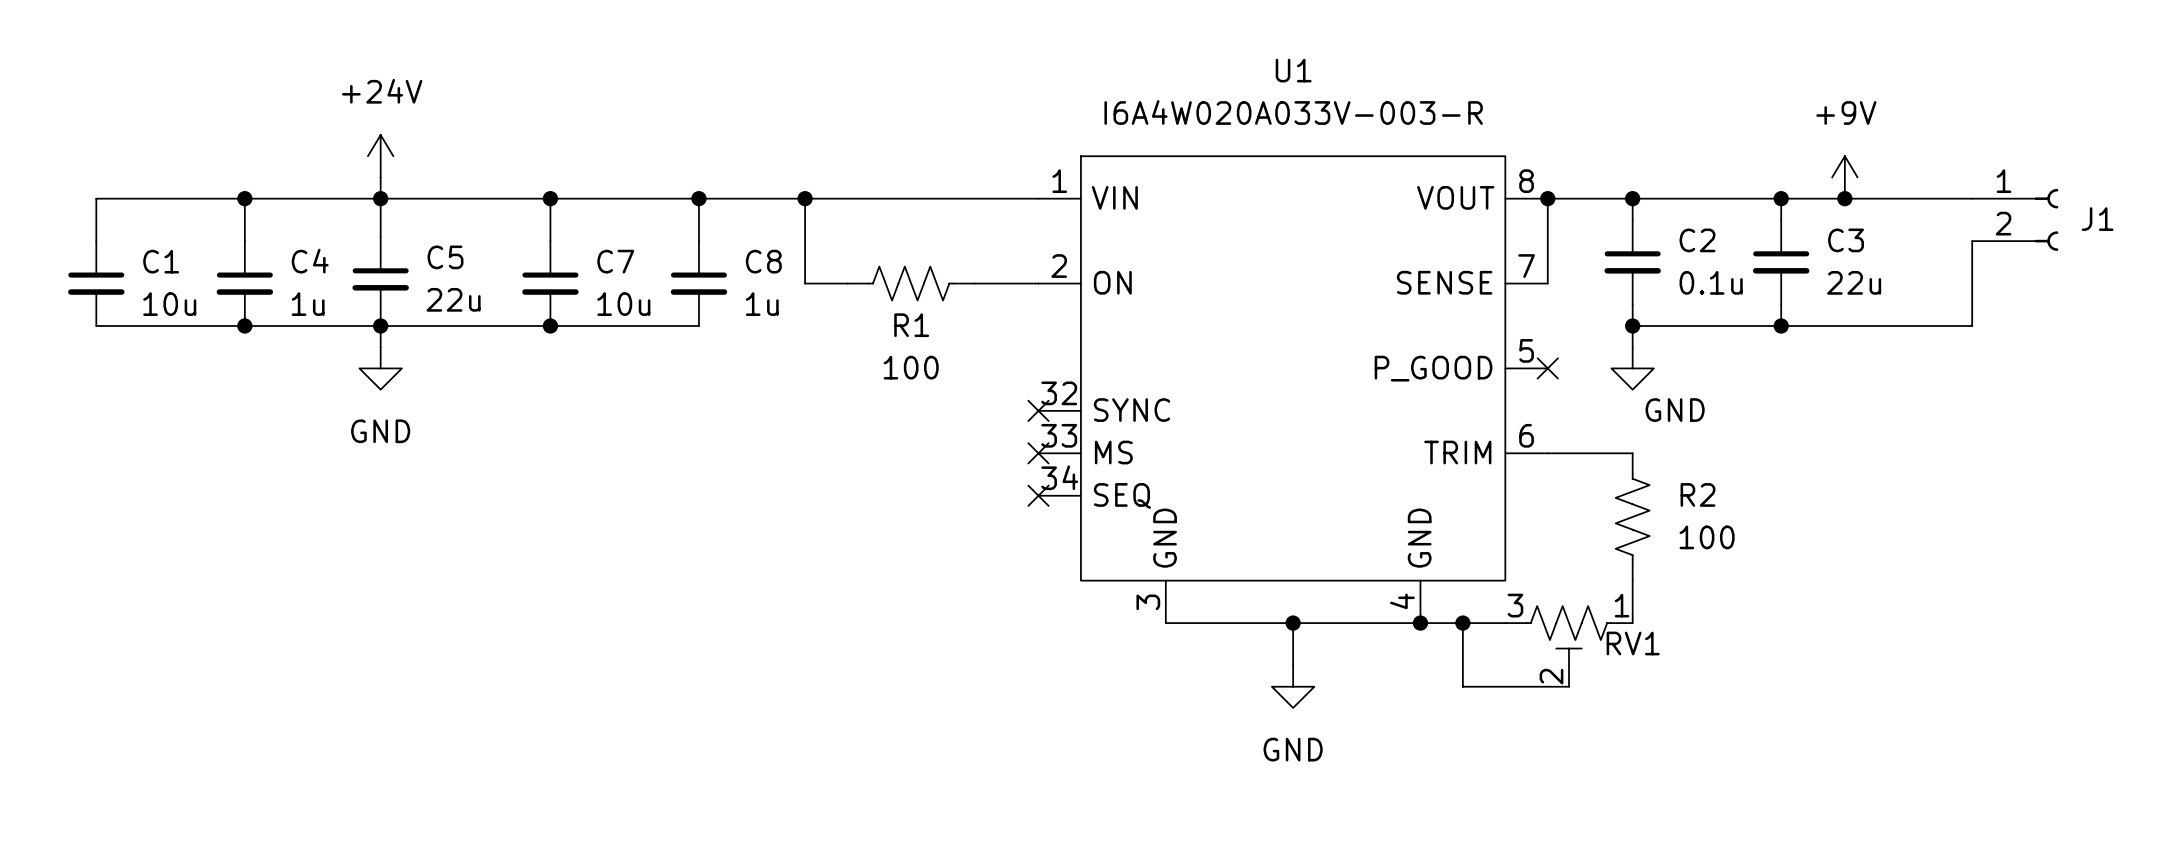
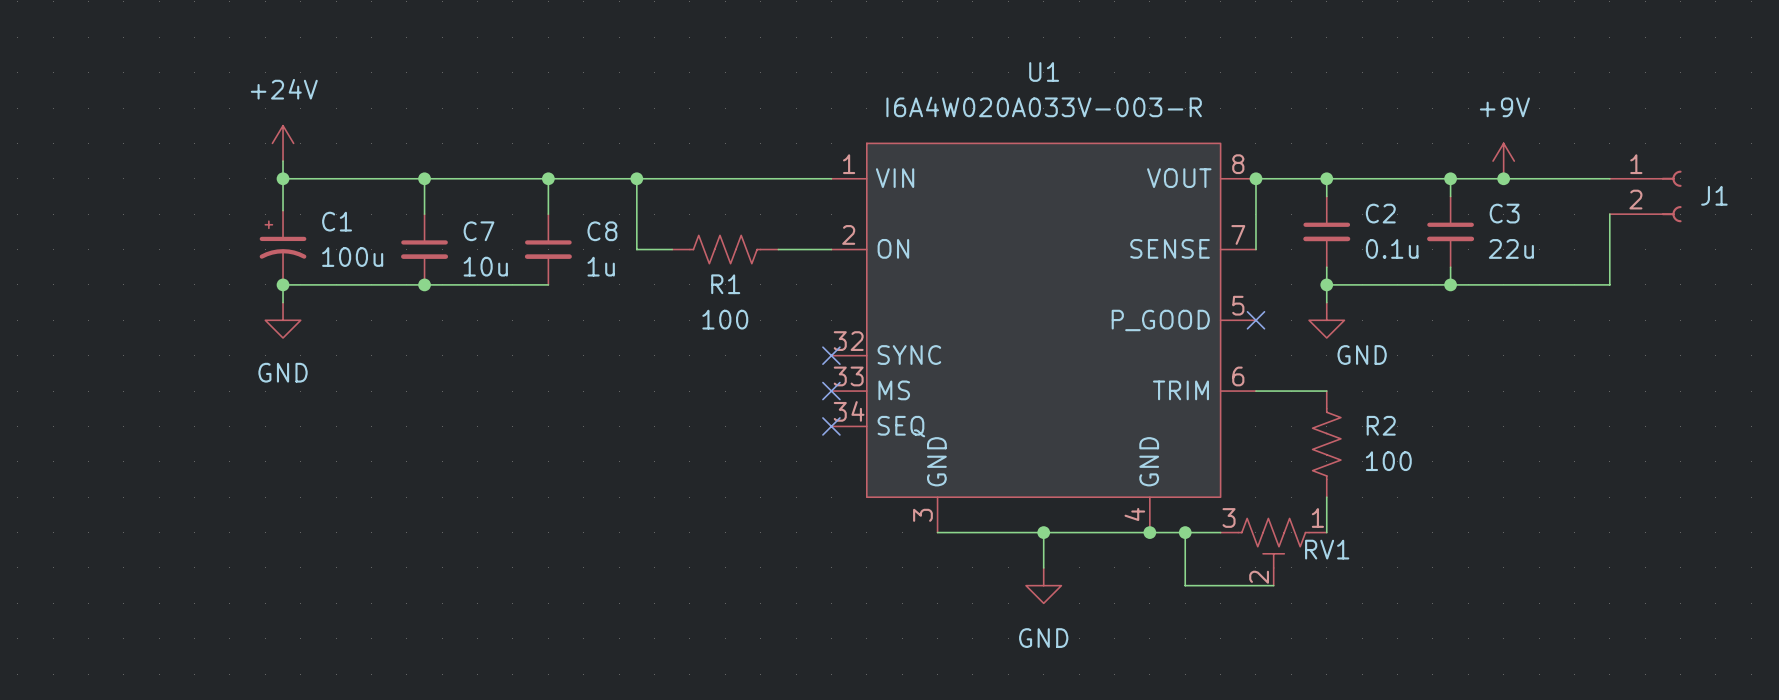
wire: (244, 198) (244, 241) -> none
junction: (244, 198) -> none
wire: (380, 198) (96, 198) (96, 241) -> none
C1 symbol: [68, 241, 125, 326] -> [259, 210, 307, 282]
C5: 22u (380, 279) -> none
C4: 1u (244, 283) -> none
C1 value: 10u (169, 304) -> 100u (352, 257)
wire: (96, 325) (380, 325) -> none
junction: (244, 325) -> none

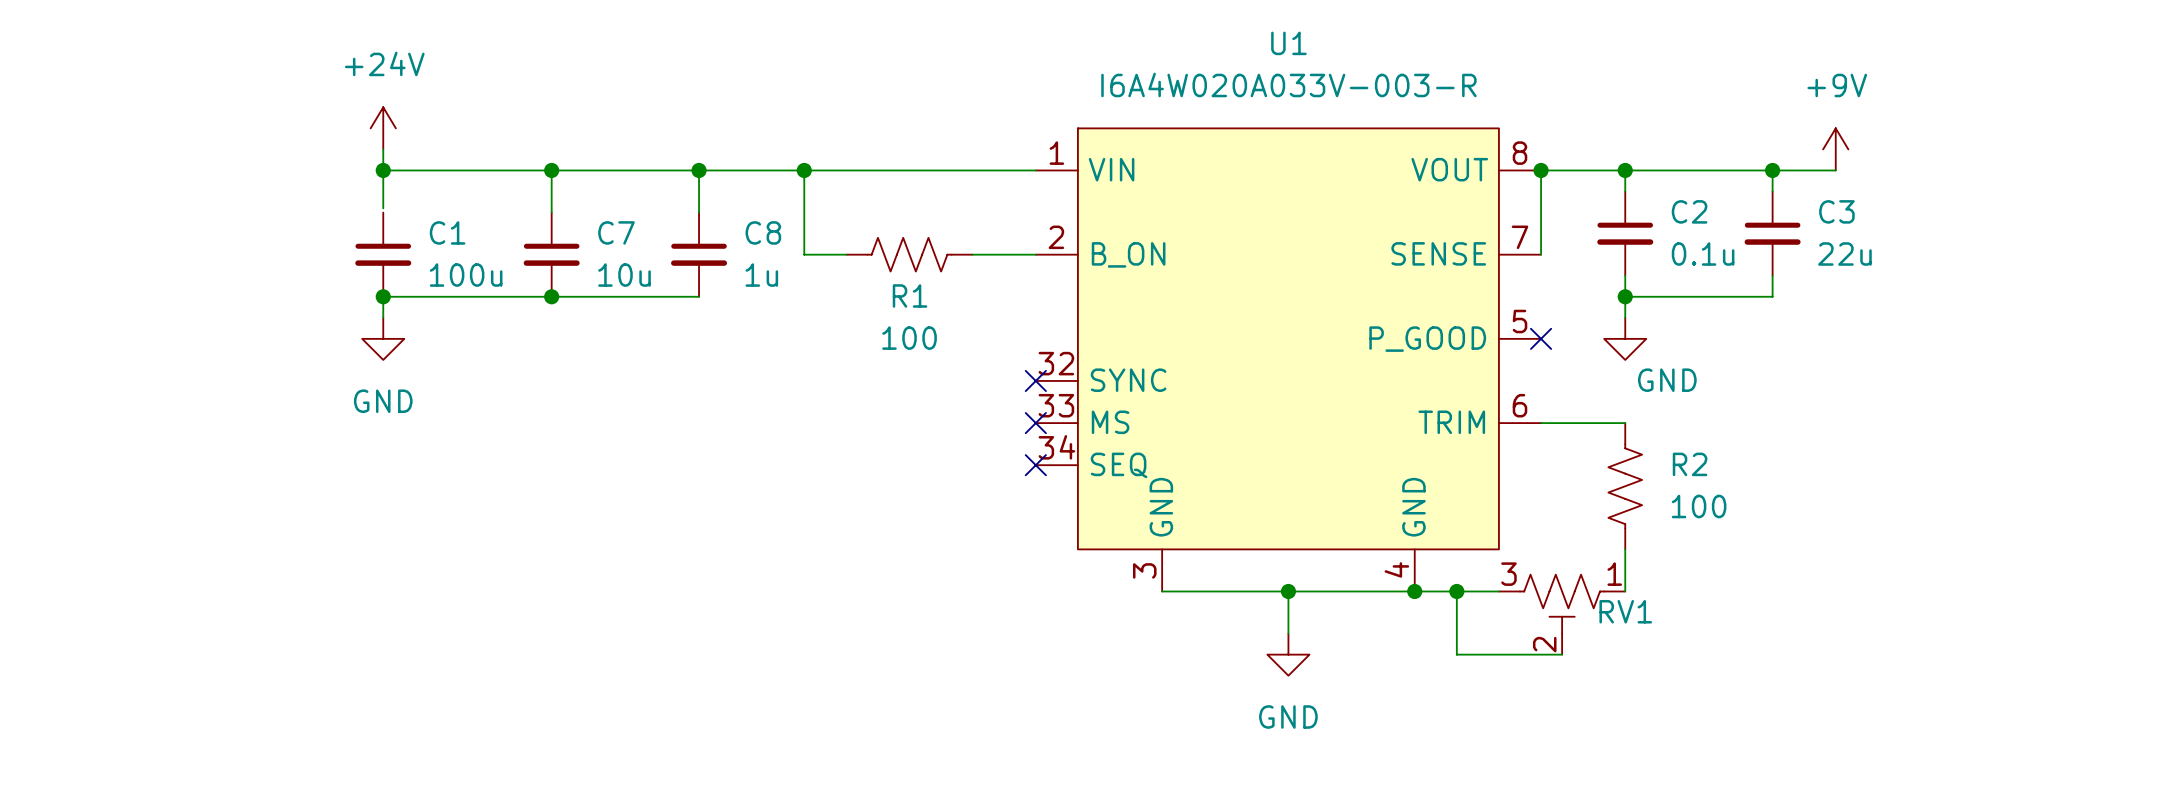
wire: (1503, 178) (1609, 178) -> none
junction: (1503, 178) -> none
J1: (1645, 196) -> none
C1 symbol: [259, 210, 307, 282] -> [355, 212, 412, 297]
wire: (1609, 214) (1609, 284) (1450, 284) -> none
U1 pin name: ON (893, 248) -> B_ON (1128, 254)
junction: (1450, 284) -> none

